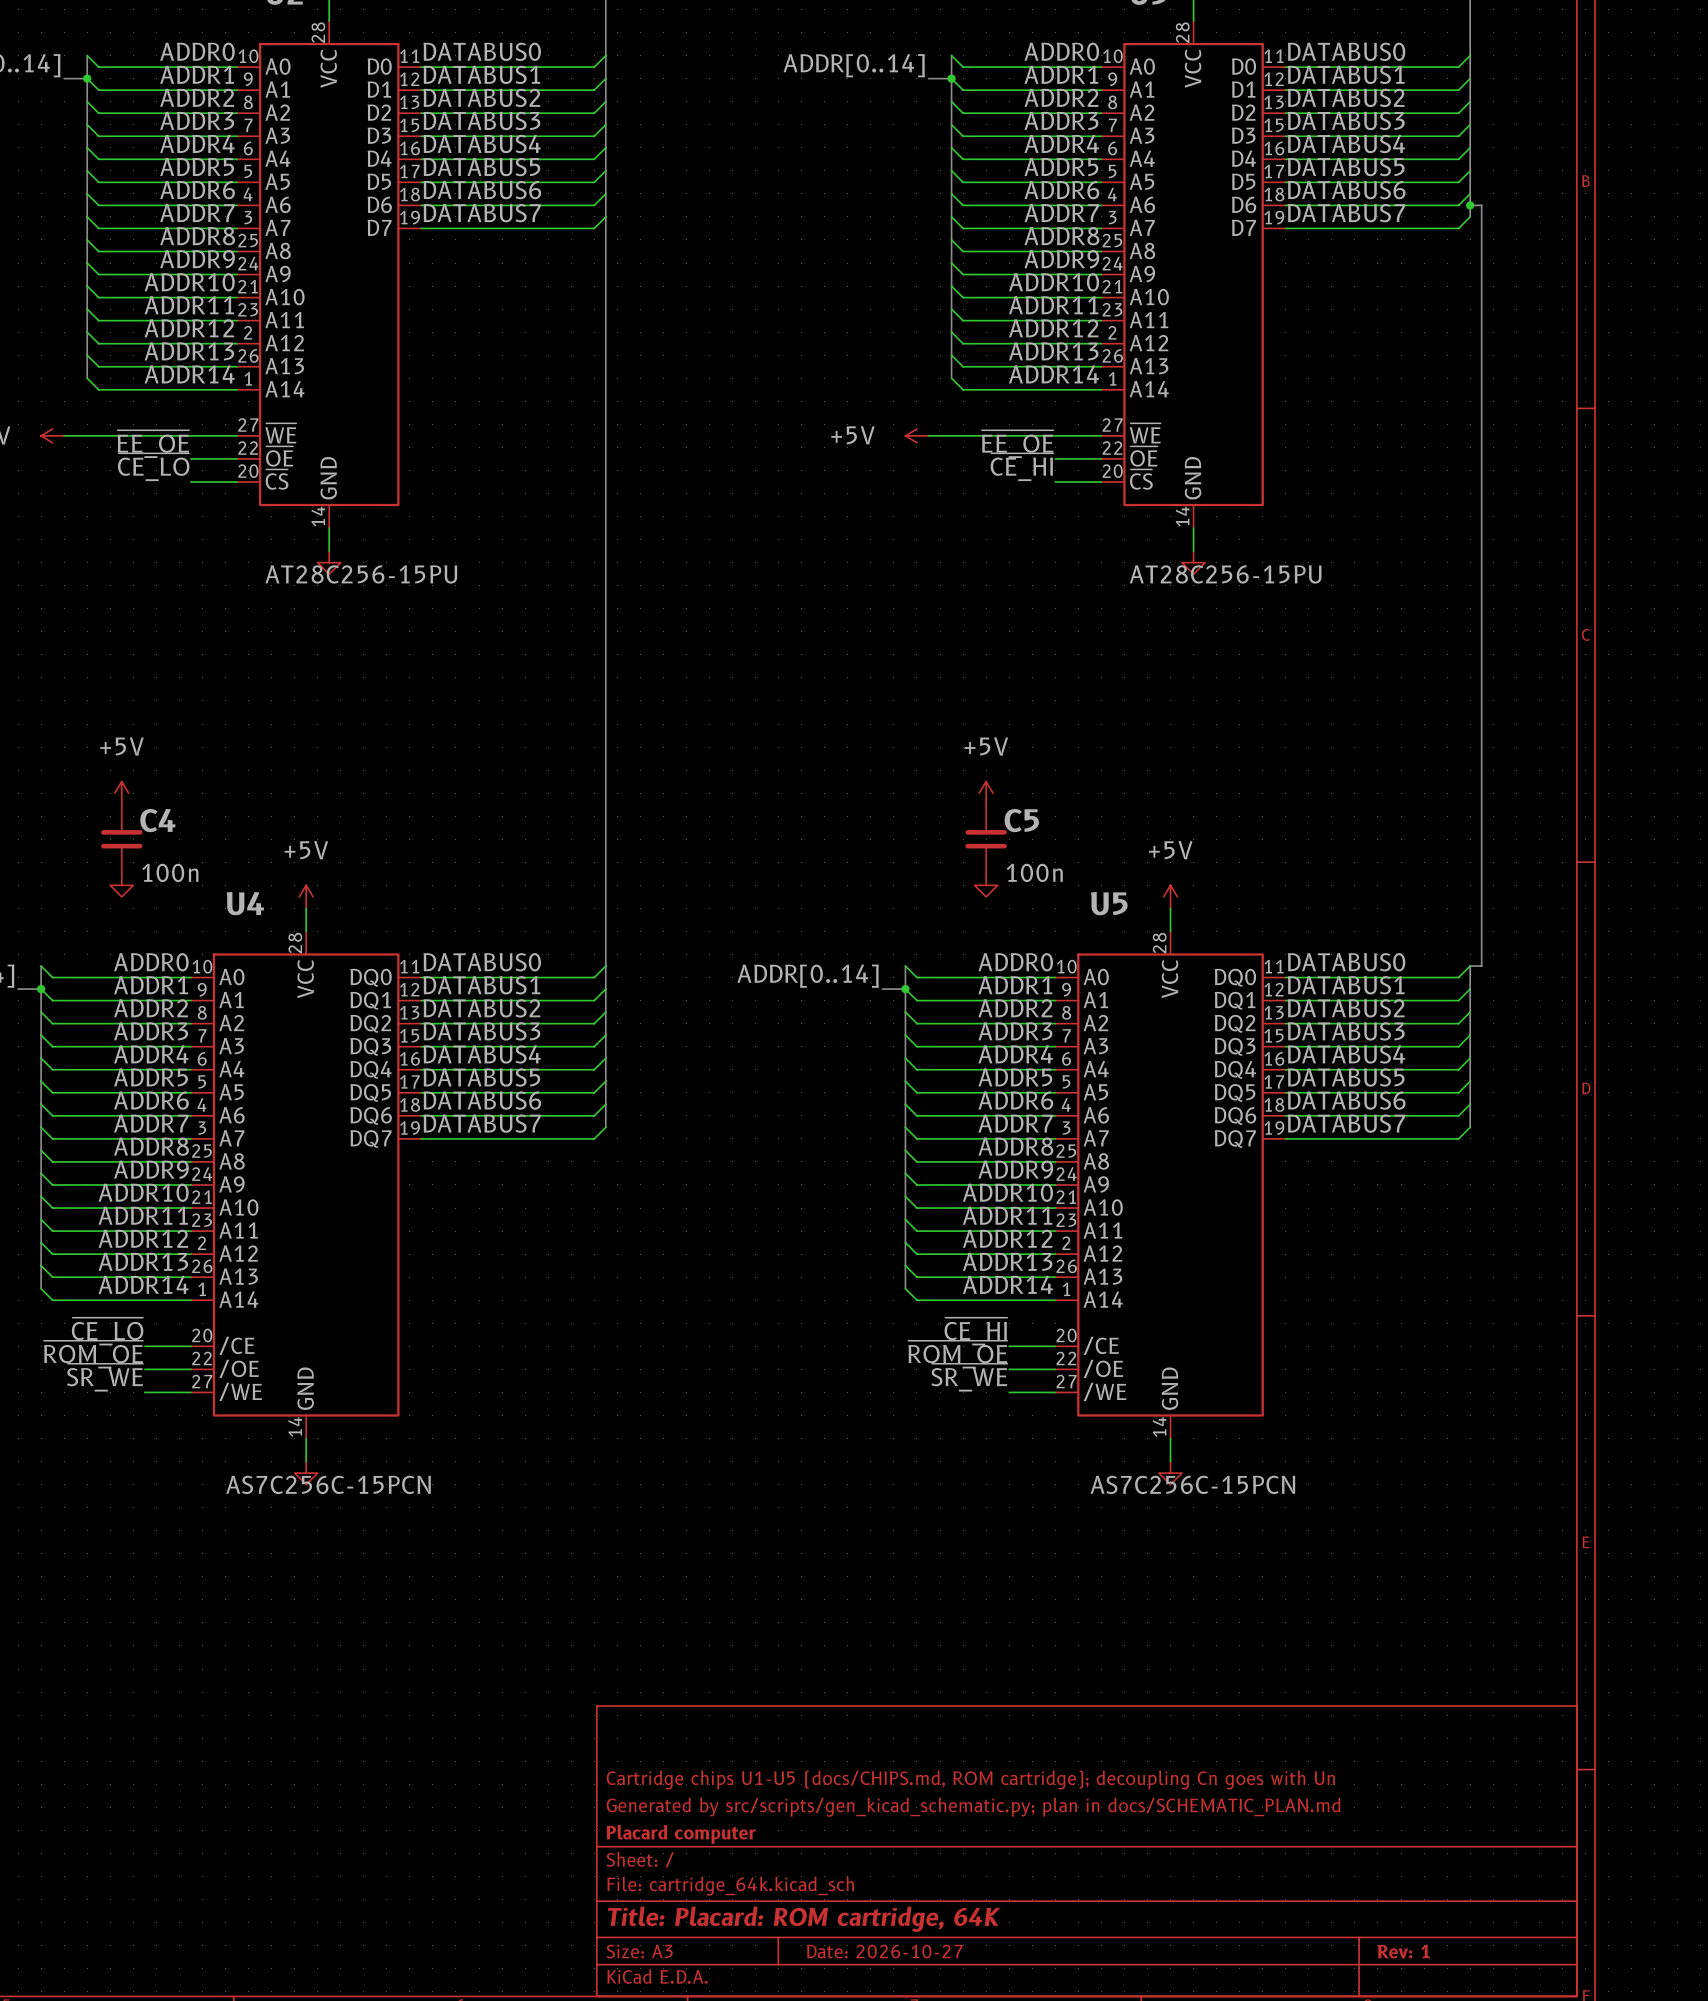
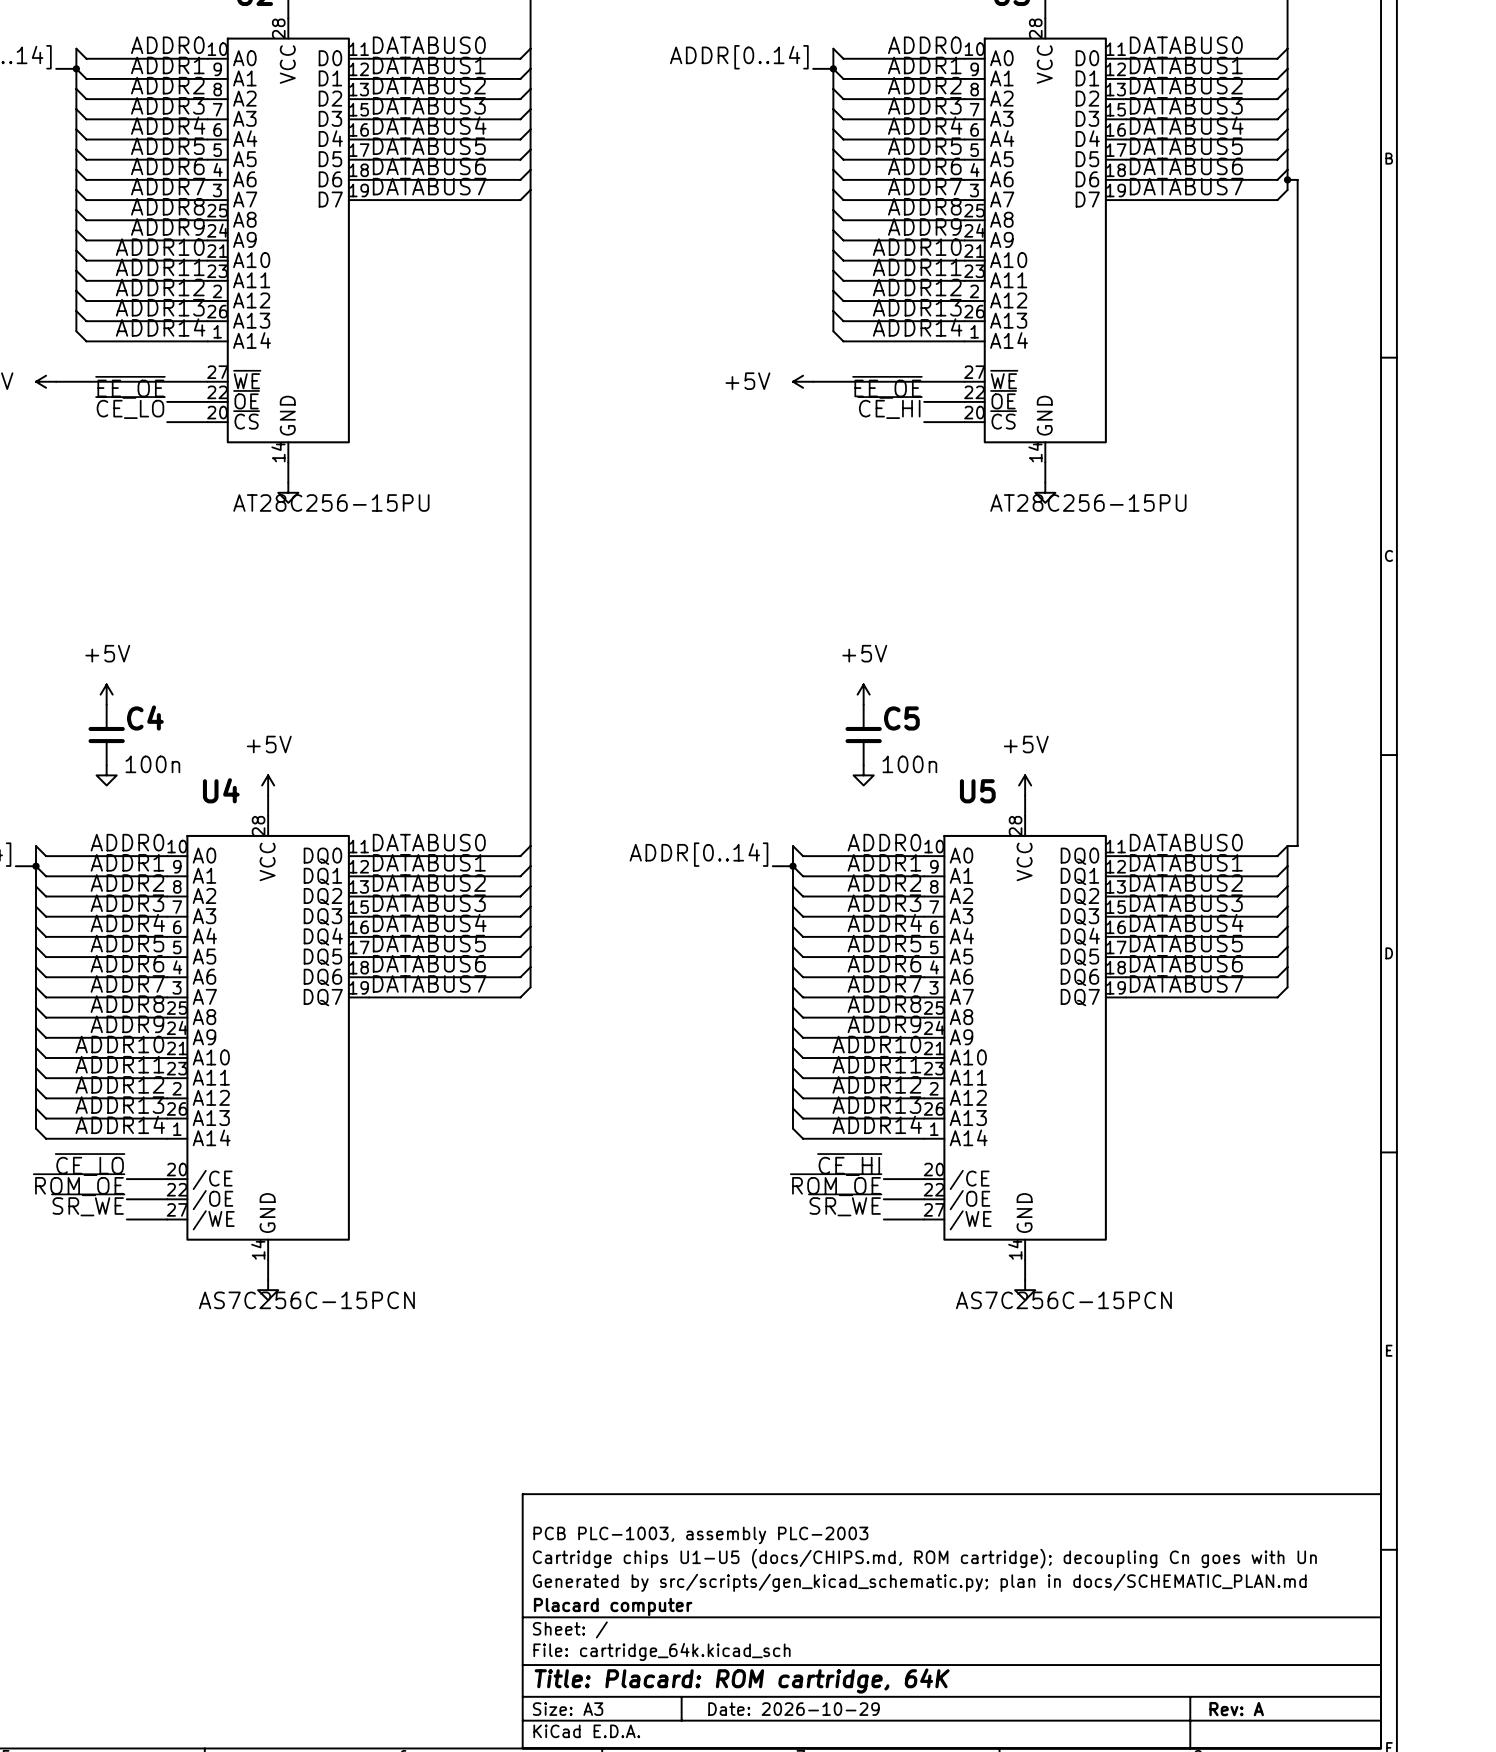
title block: none -> PCB PLC-1003, assembly PLC-2003 (700, 1535)
title block: Date: 2026-10-27 (884, 1951) -> Date: 2026-10-29 (793, 1709)
title block: Rev: 1 (1403, 1951) -> Rev: A (1236, 1709)

